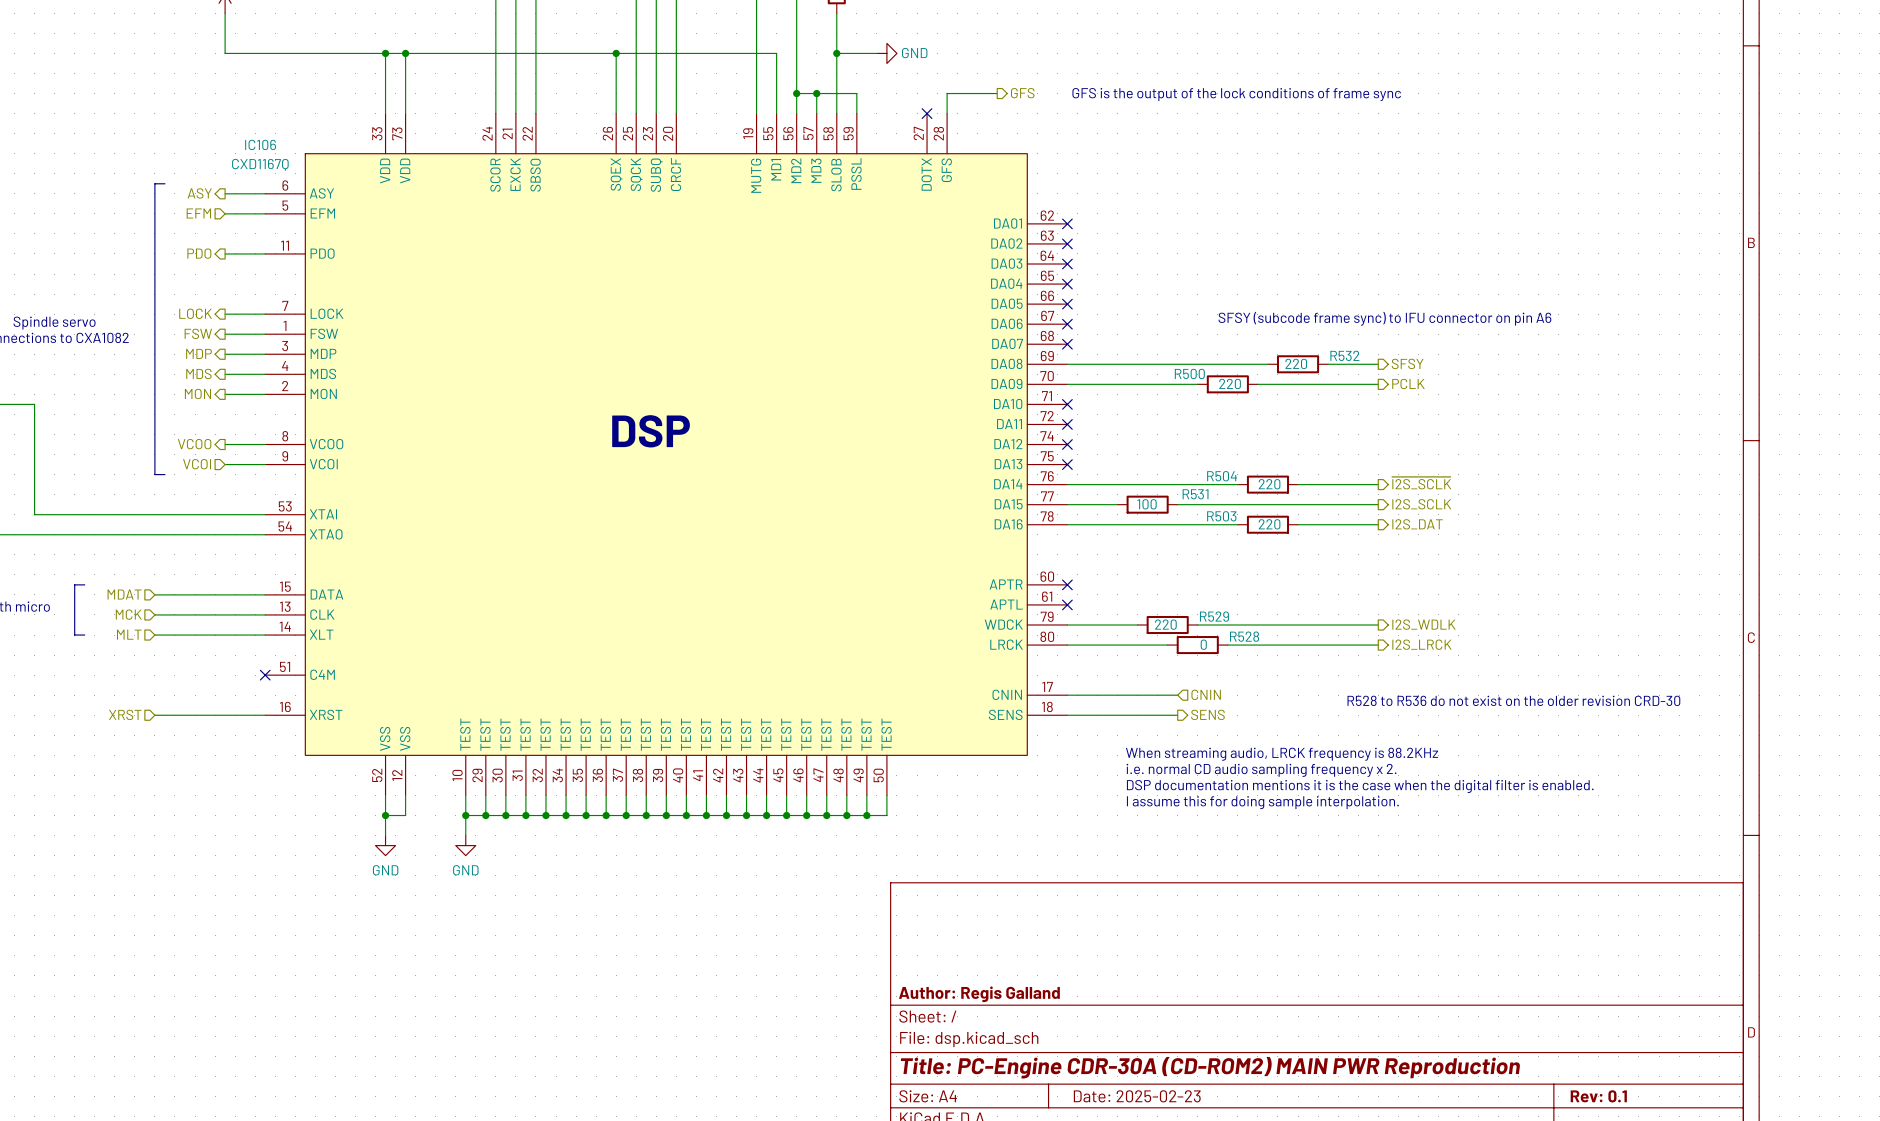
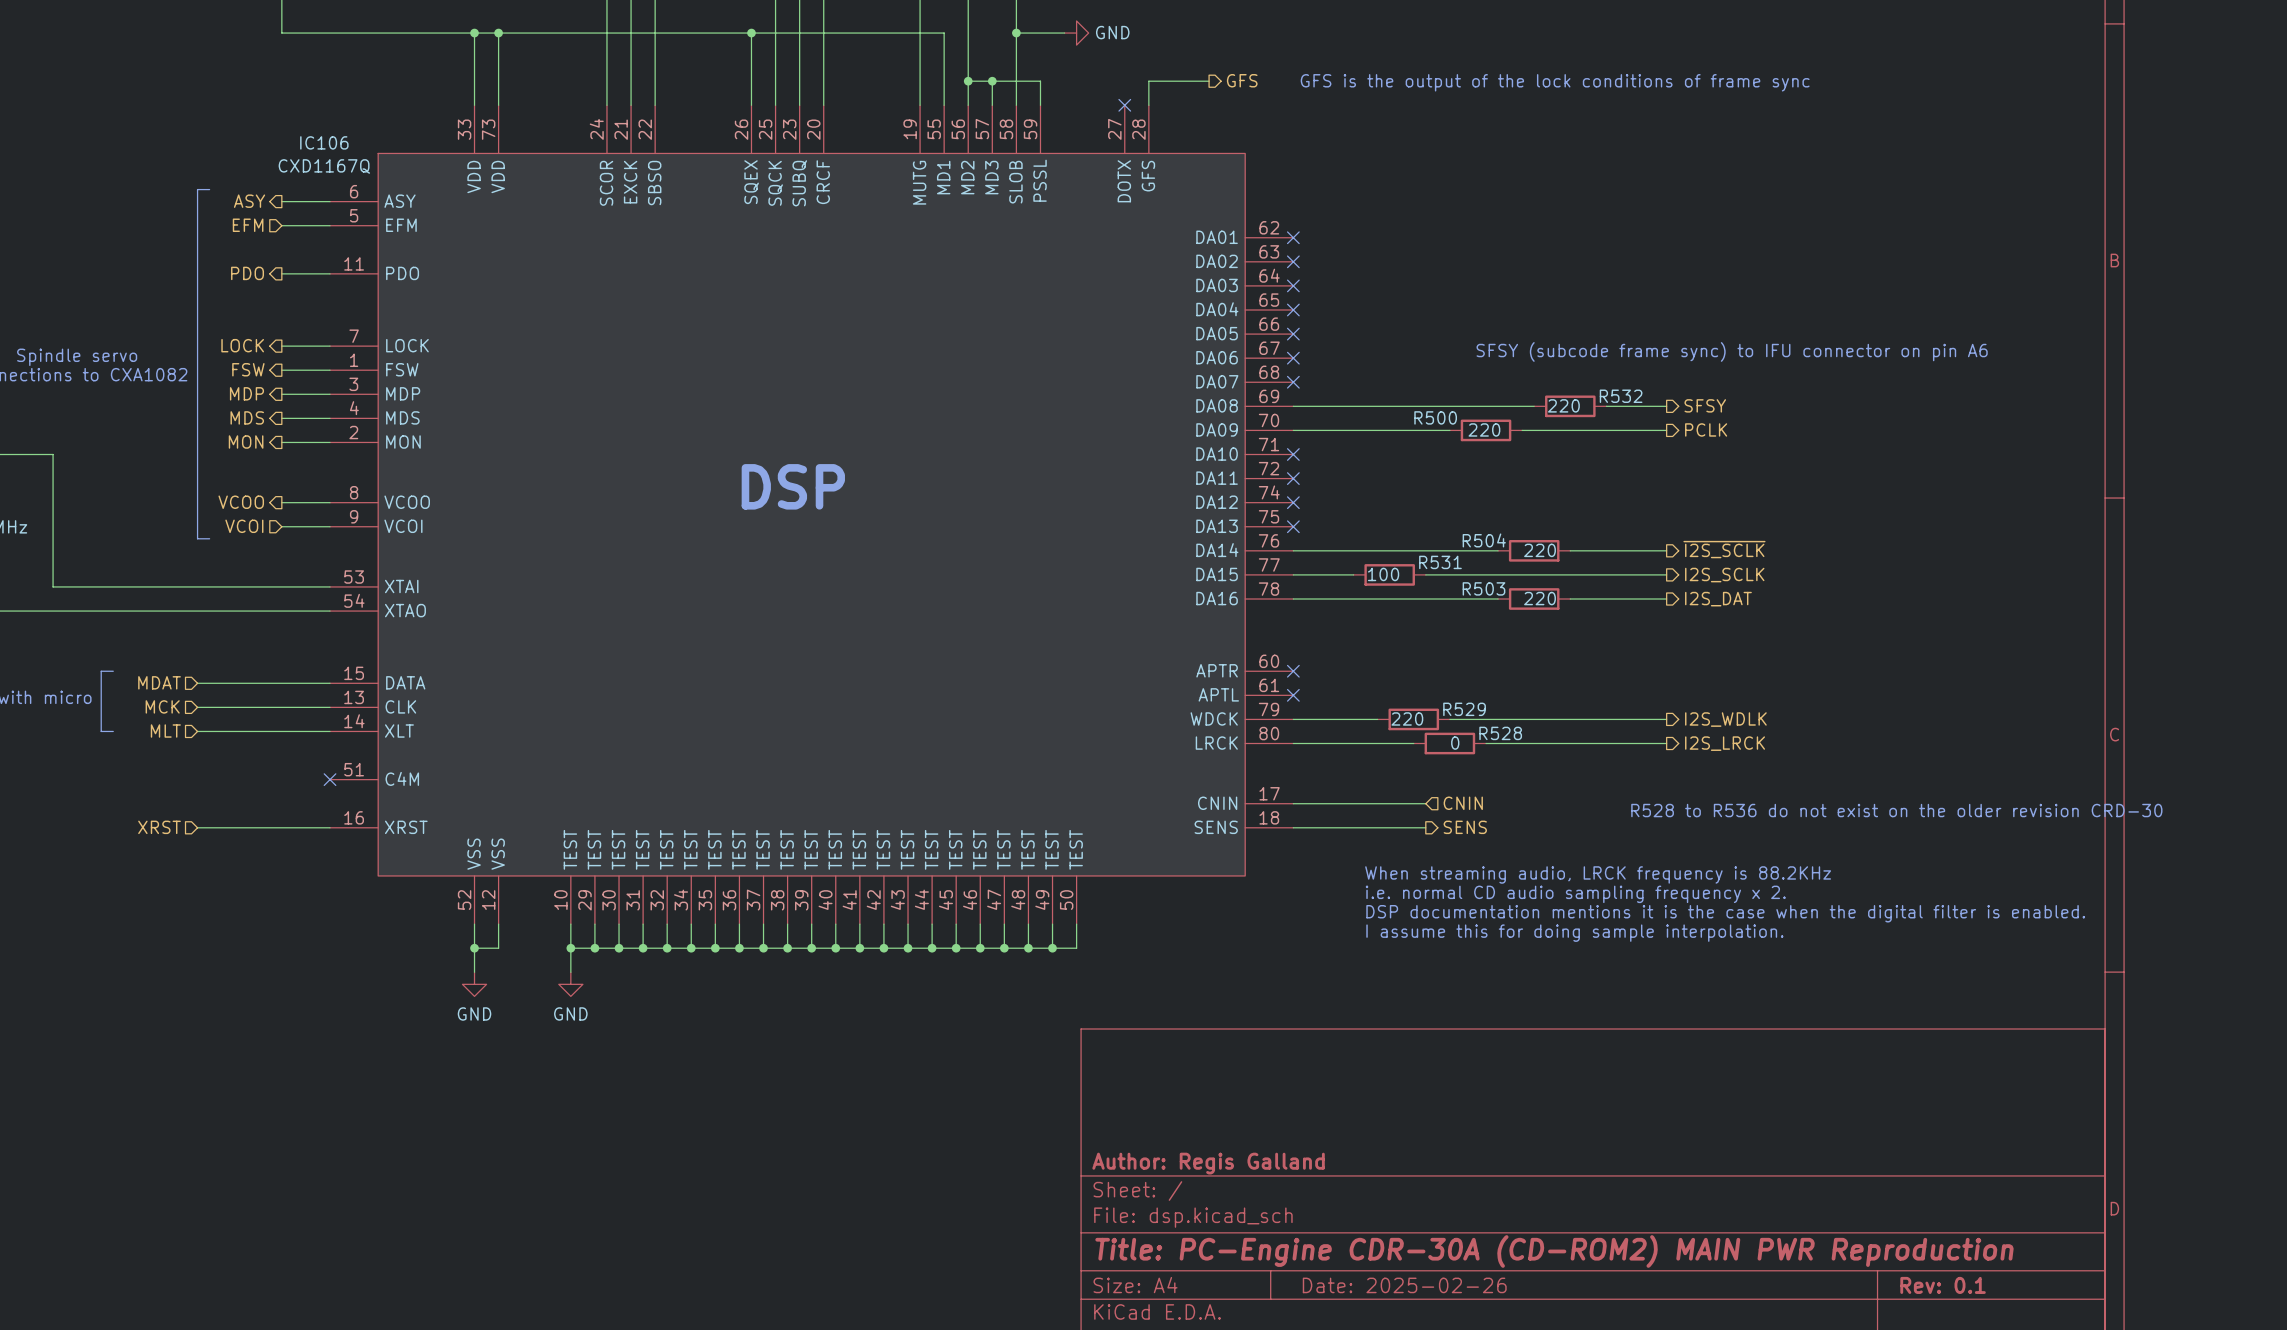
title block: Date: 2025-02-23 (1137, 1096) -> Date: 2025-02-26 (1404, 1285)

